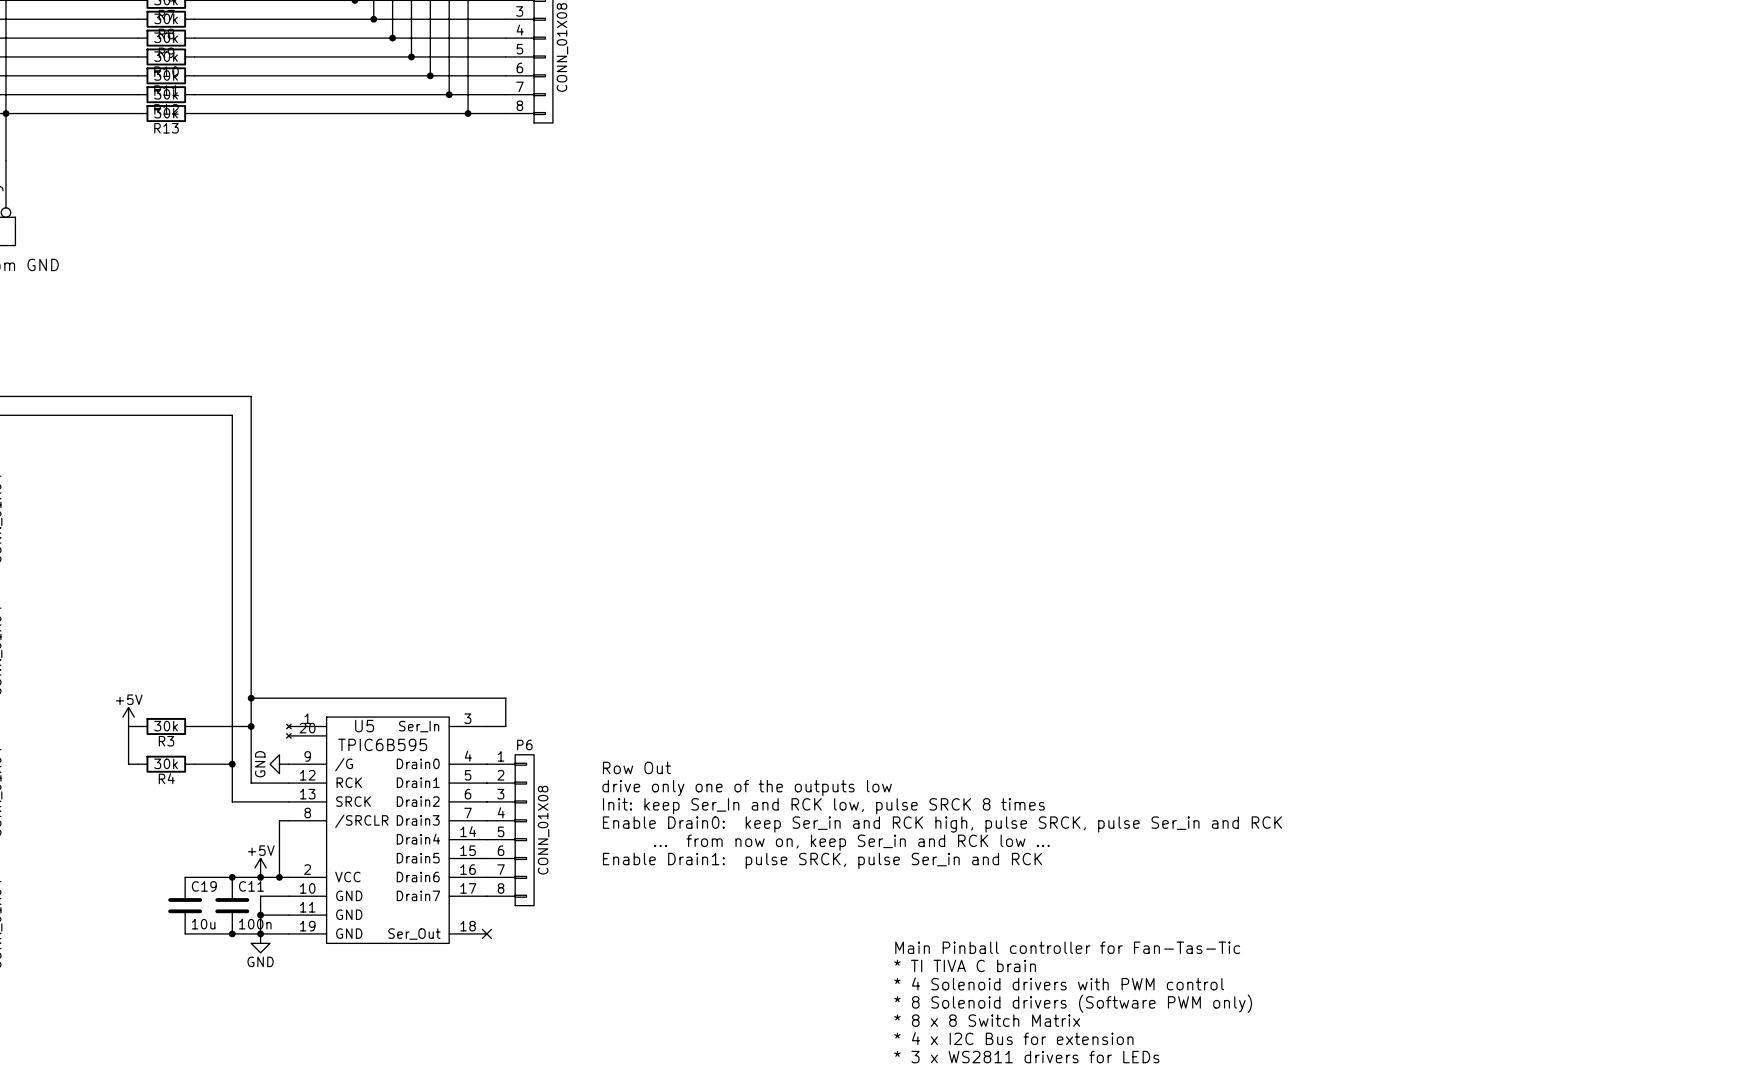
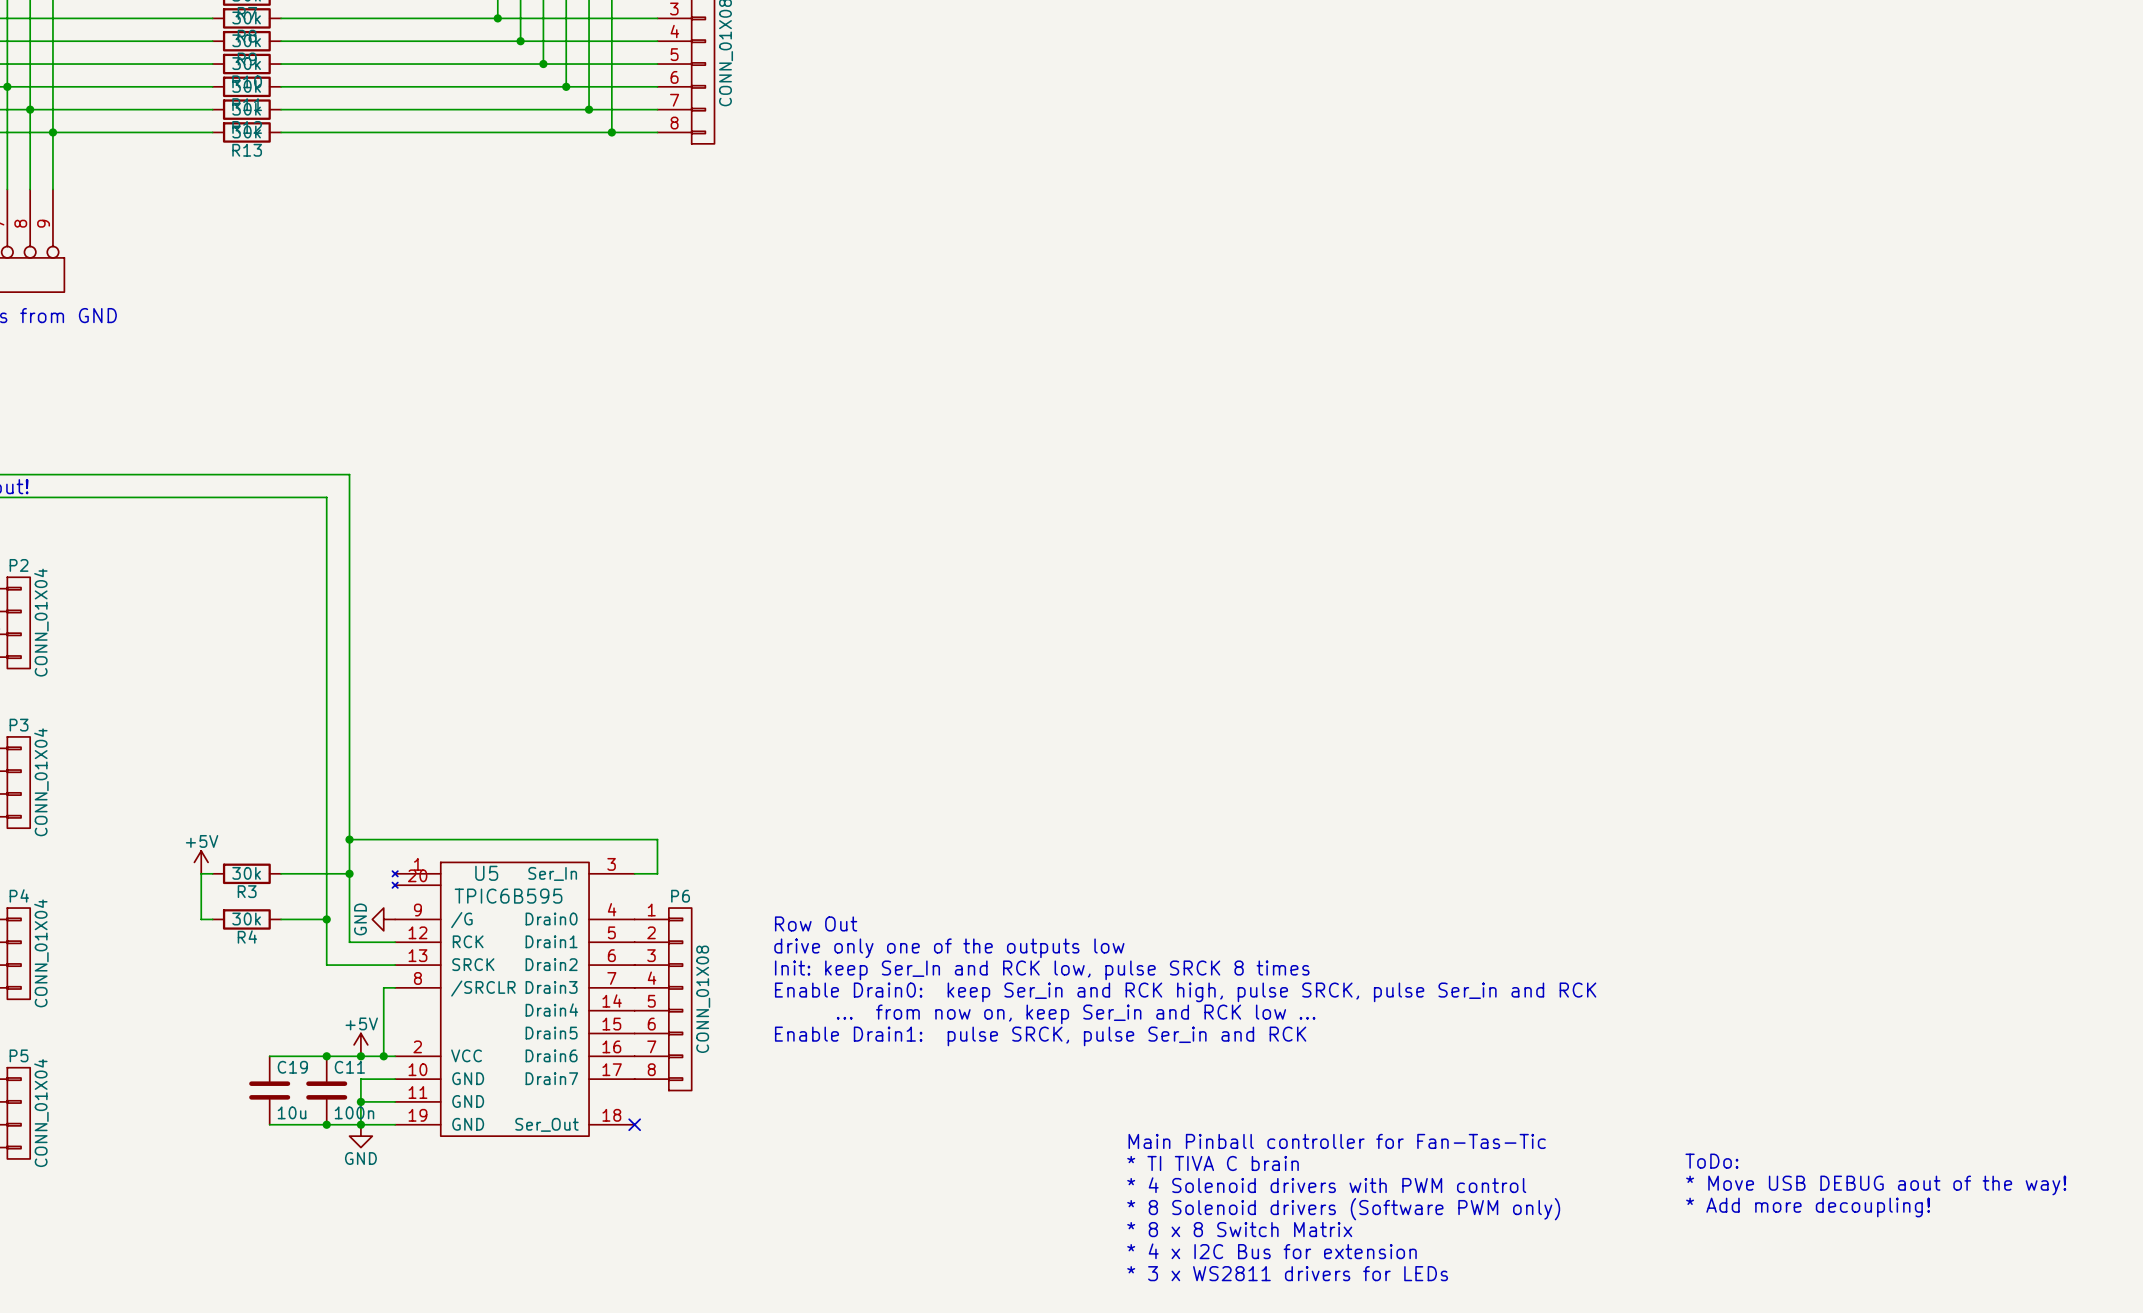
text: none -> ToDo: (1711, 1161)
text: none -> * Move USB DEBUG aout of the way! (1876, 1185)
text: none -> * Add more decoupling! (1808, 1207)

